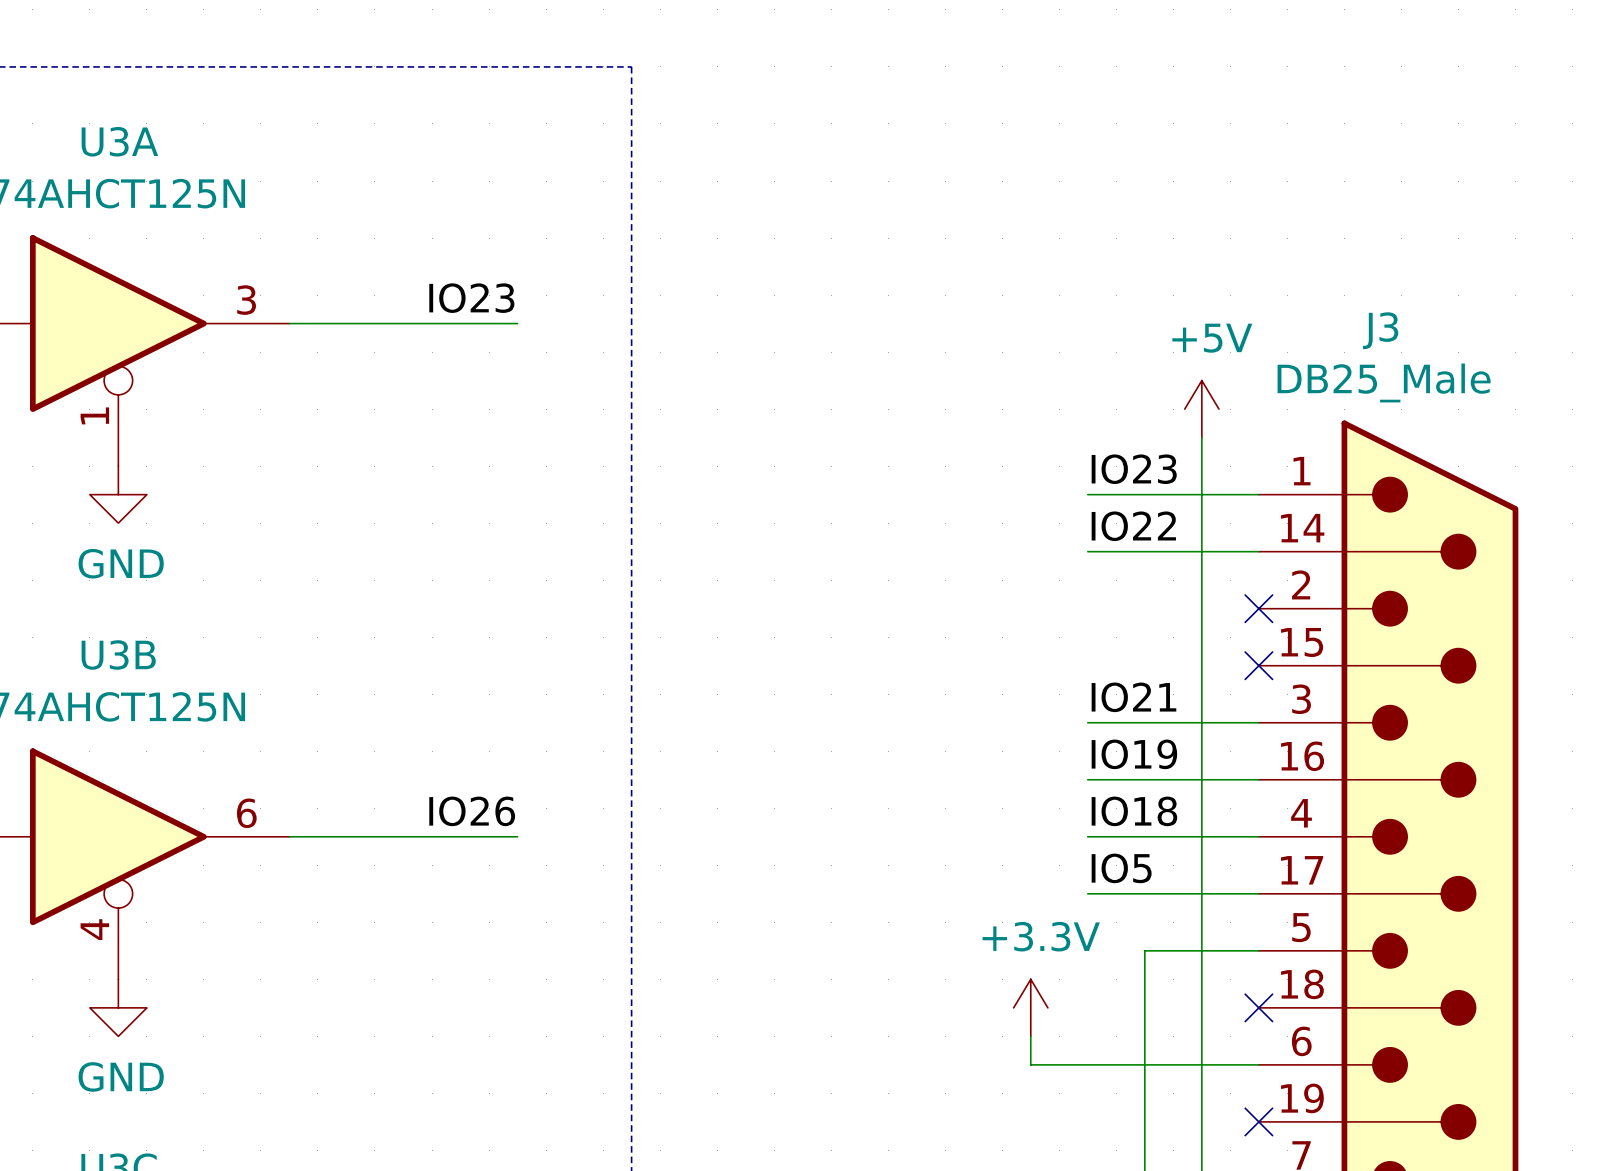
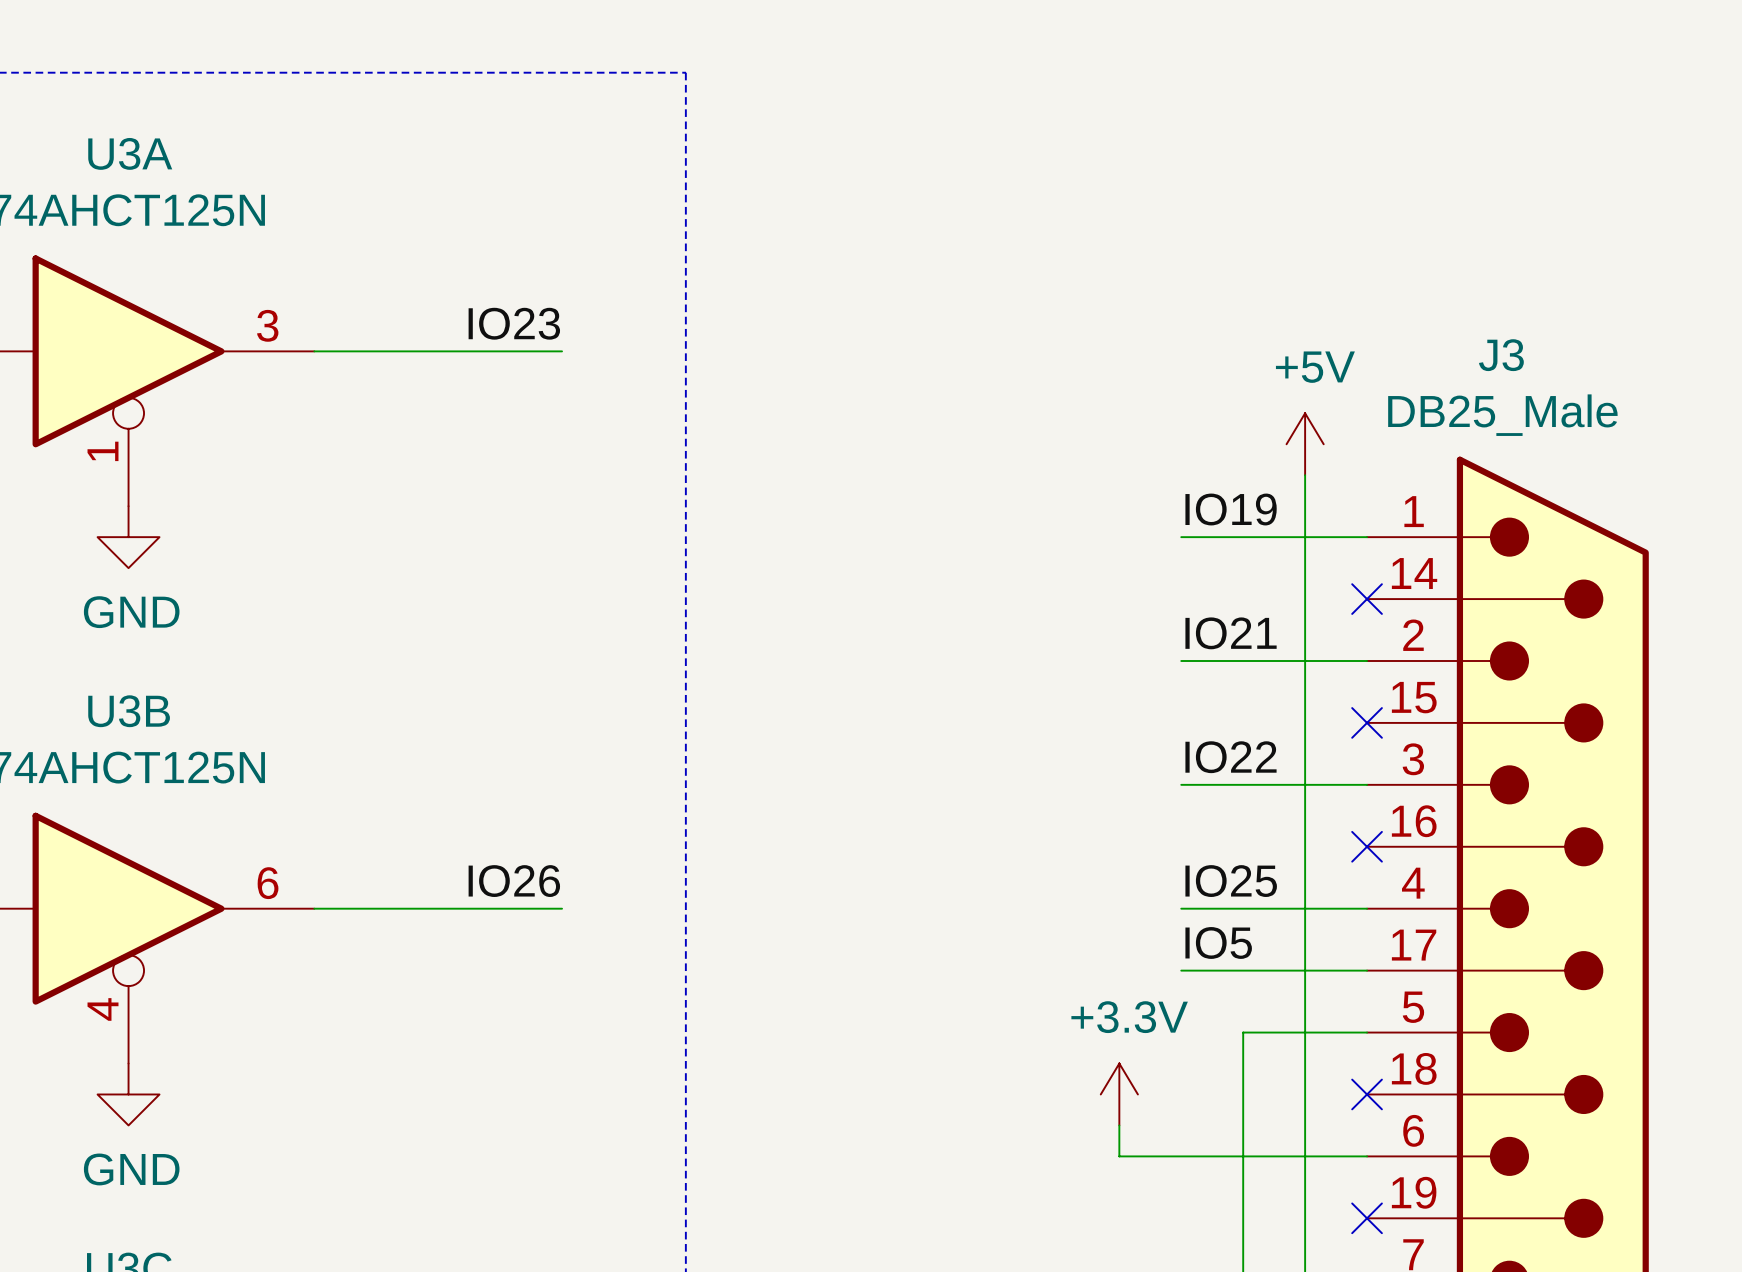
label: IO23 (1134, 469) -> IO19 (1231, 509)
label: IO22 (1133, 526) -> IO21 (1231, 633)
wire: (1087, 551) (1258, 551) -> (1181, 661) (1367, 661)
no-connect mark position: (1258, 608) -> (1367, 599)
label: IO21 (1133, 697) -> IO22 (1231, 757)
label: IO19 (1134, 754) -> none
wire: (1087, 779) (1258, 779) -> none
no-connect mark: none -> (1367, 846)
label: IO18 (1134, 811) -> IO25 (1231, 881)

